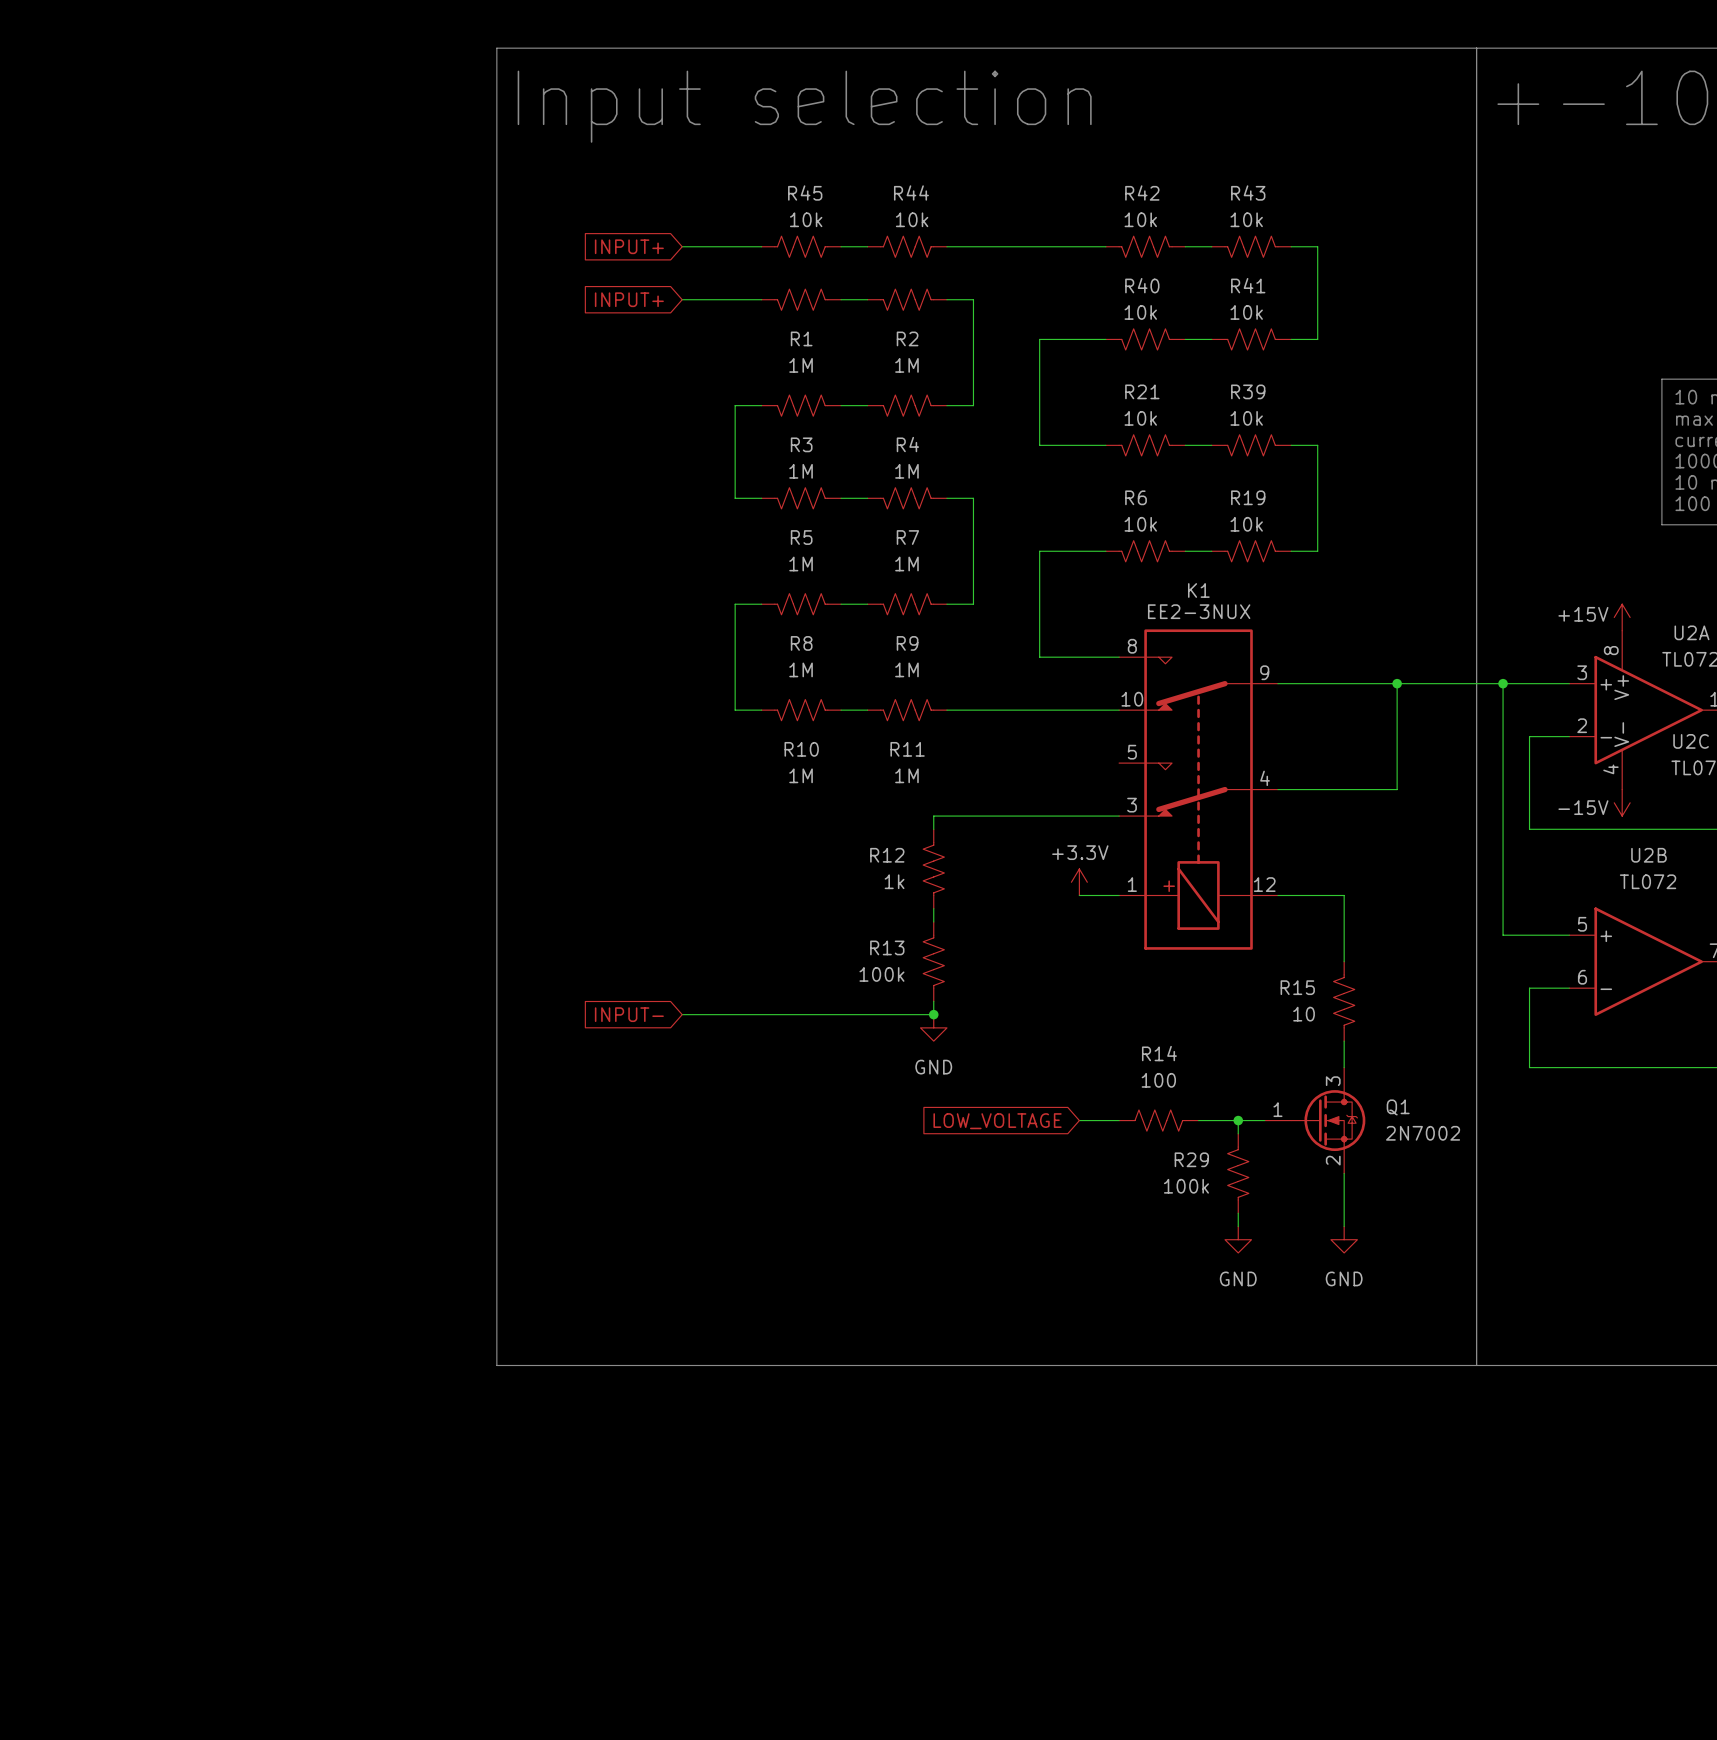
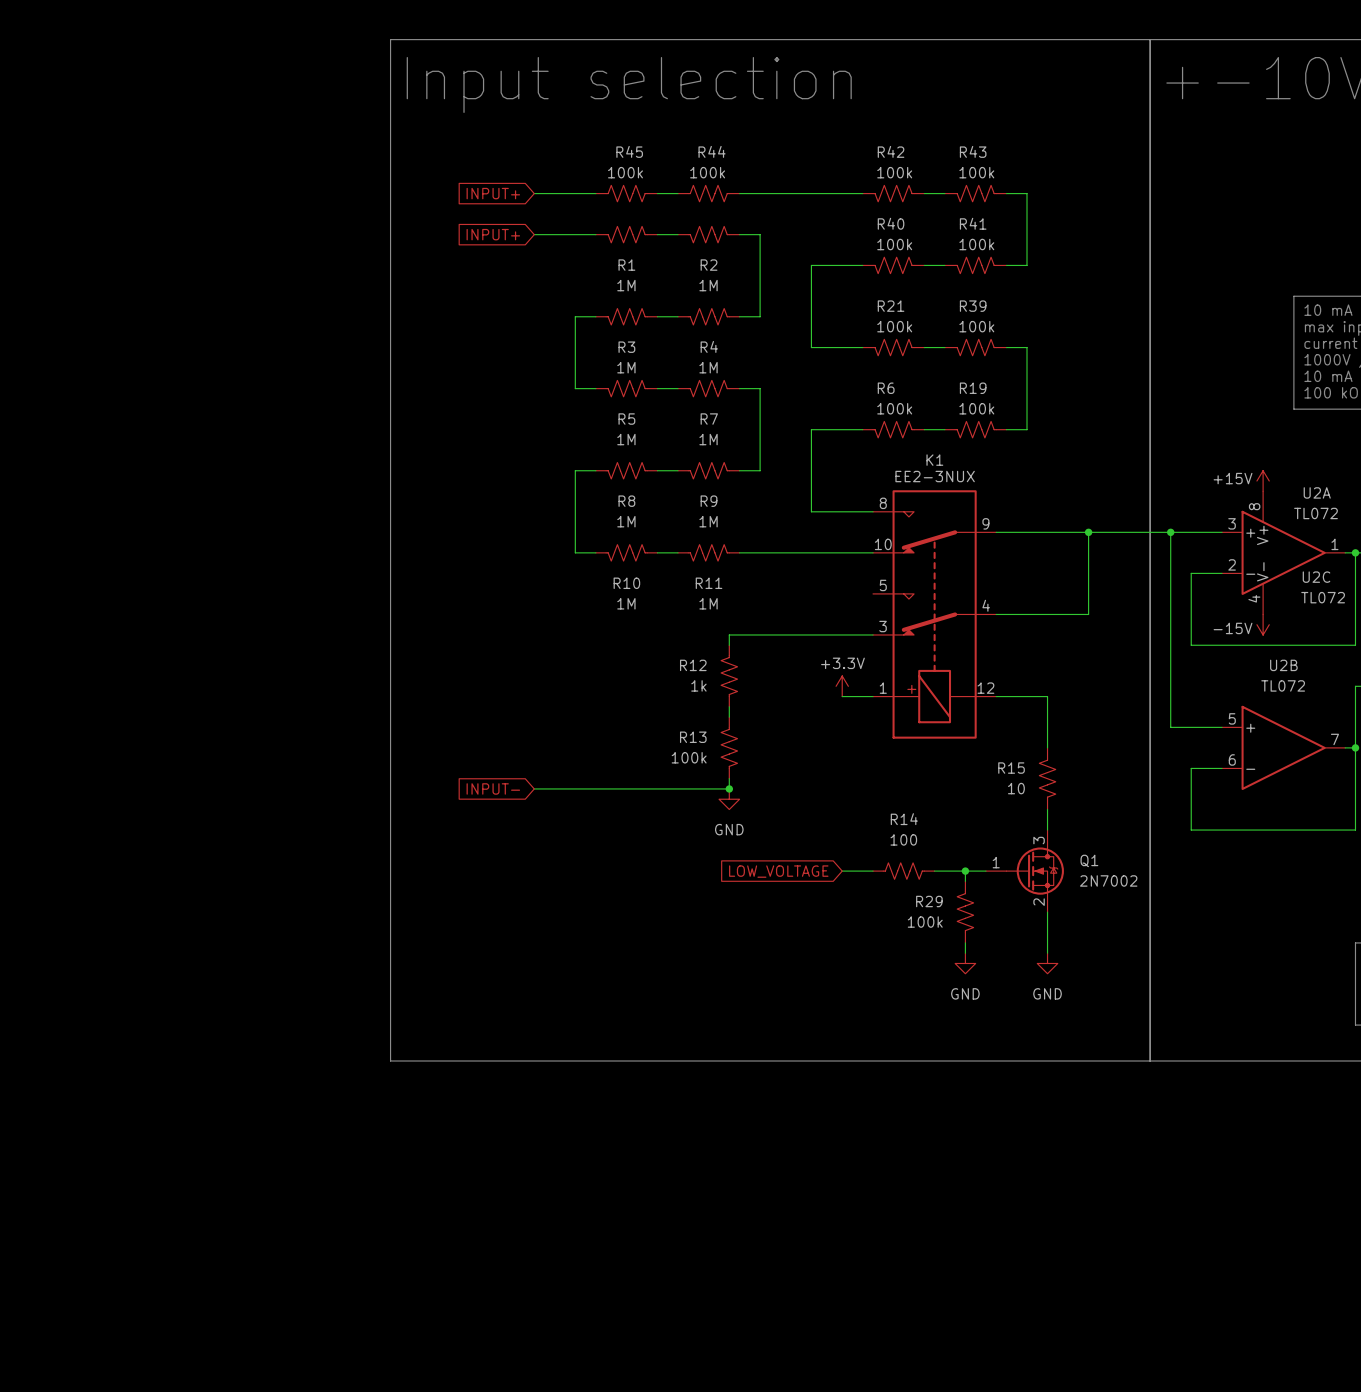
R45 value: 10k (806, 219) -> 100k (625, 172)
R44 value: 10k (912, 219) -> 100k (707, 172)
R42 value: 10k (1140, 219) -> 100k (894, 172)
R43 value: 10k (1246, 219) -> 100k (976, 172)
R40 value: 10k (1140, 312) -> 100k (894, 244)
R41 value: 10k (1246, 312) -> 100k (976, 244)
R21 value: 10k (1140, 418) -> 100k (894, 326)
R39 value: 10k (1246, 418) -> 100k (976, 326)
R6 value: 10k (1140, 524) -> 100k (894, 408)
R19 value: 10k (1246, 524) -> 100k (976, 408)

